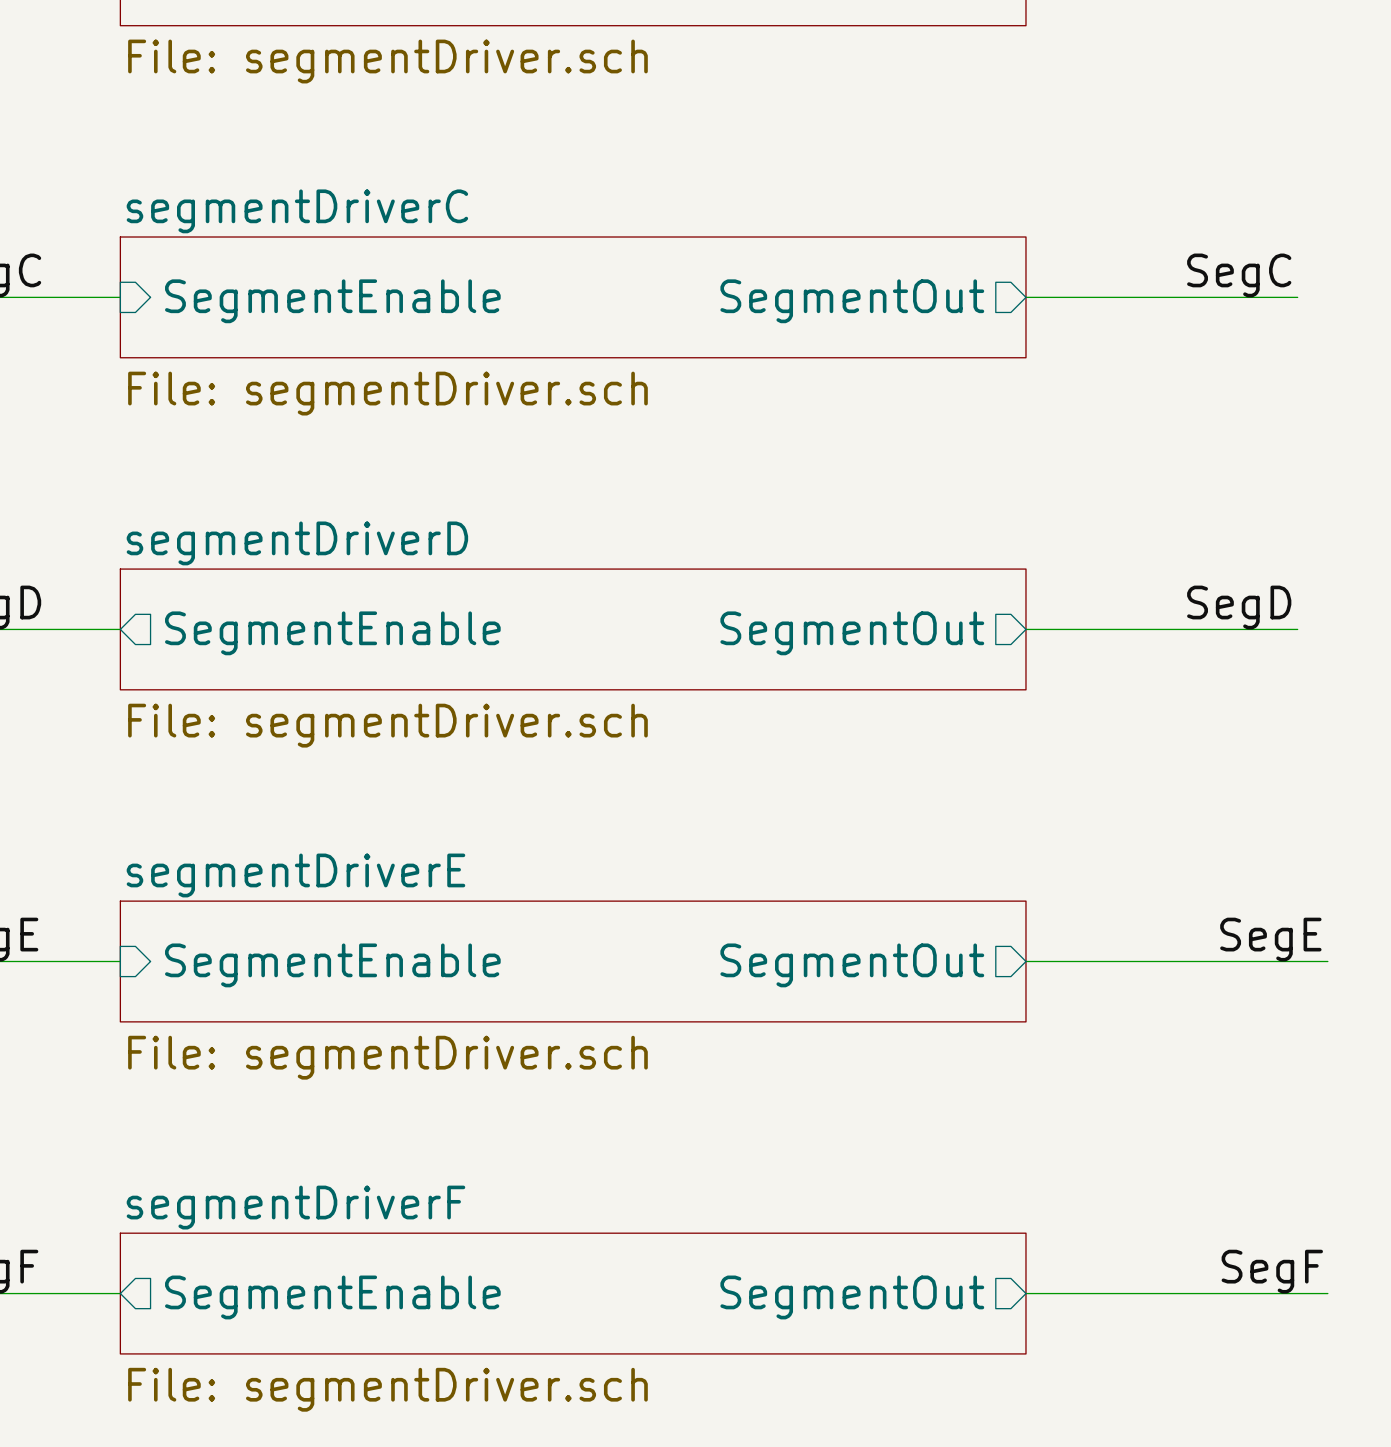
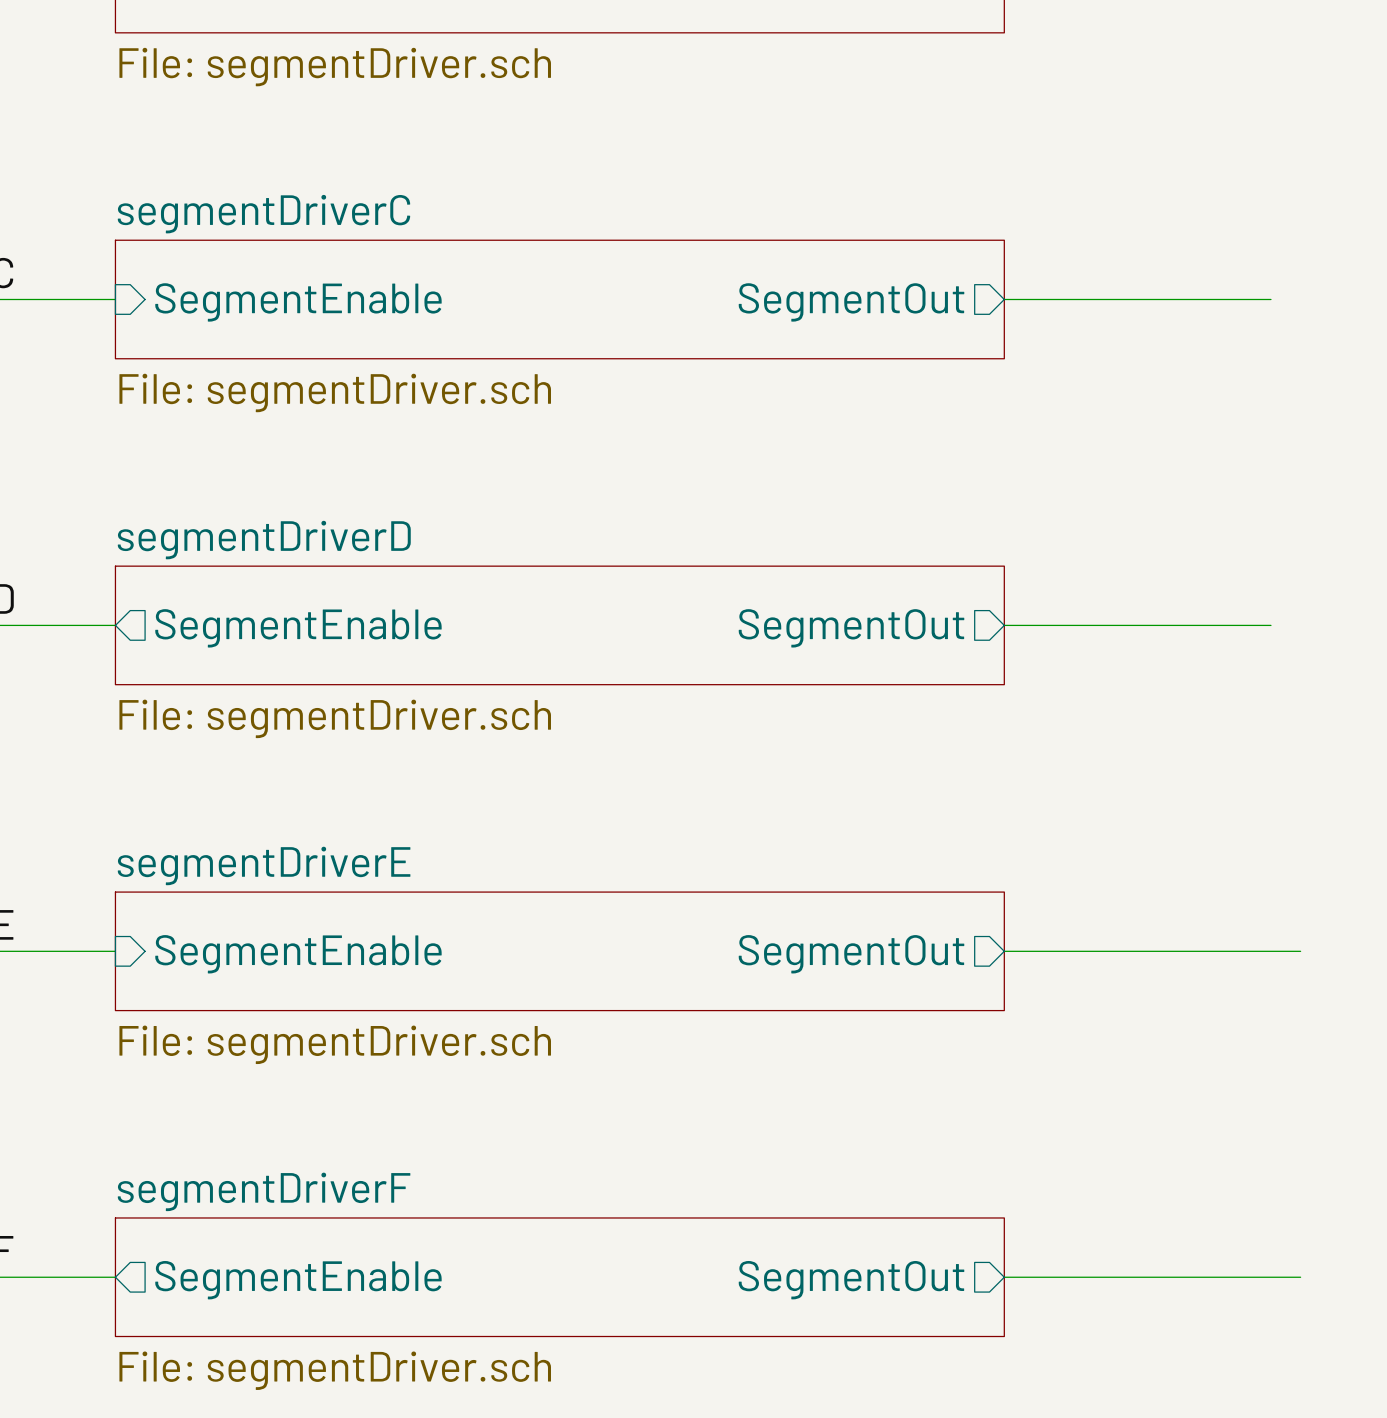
label: SegC (1239, 275) -> none
label: SegD (1239, 607) -> none
label: SegE (1270, 939) -> none
label: SegF (1272, 1271) -> none

